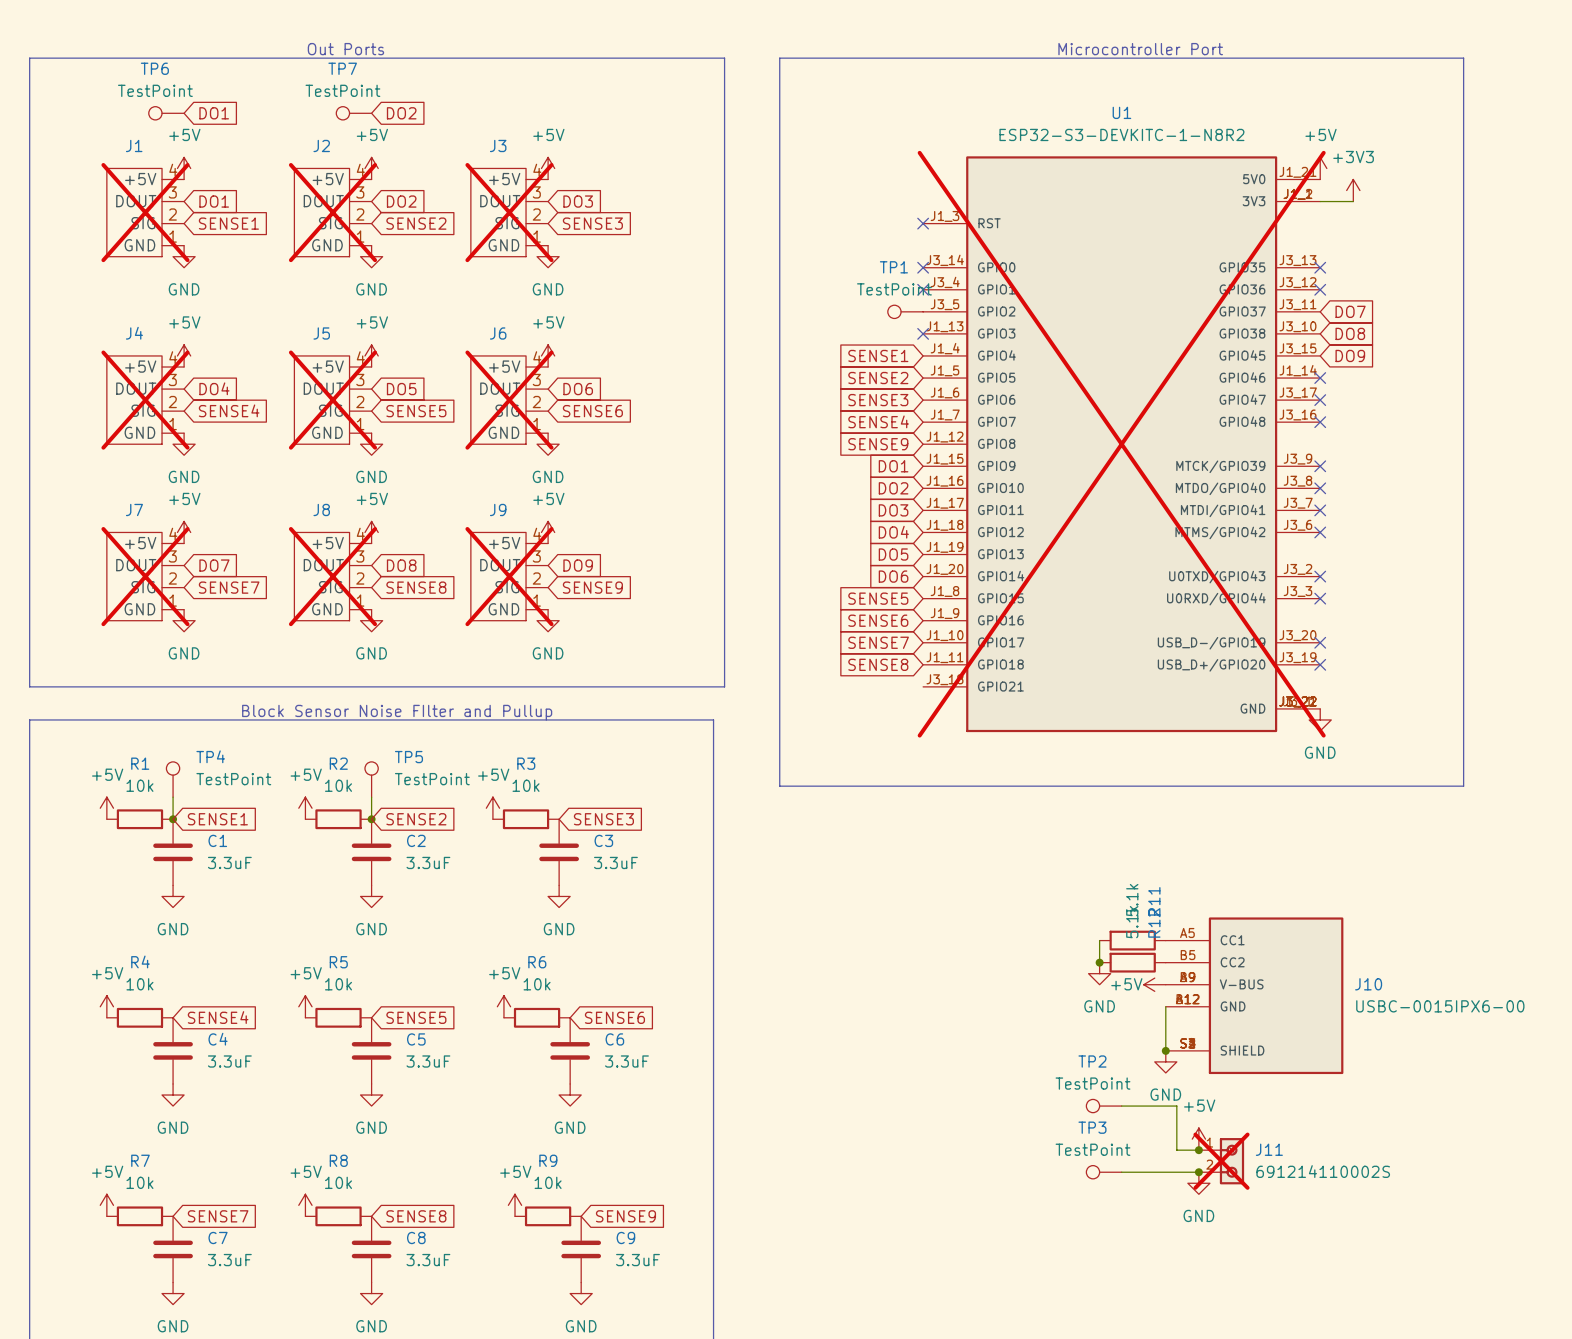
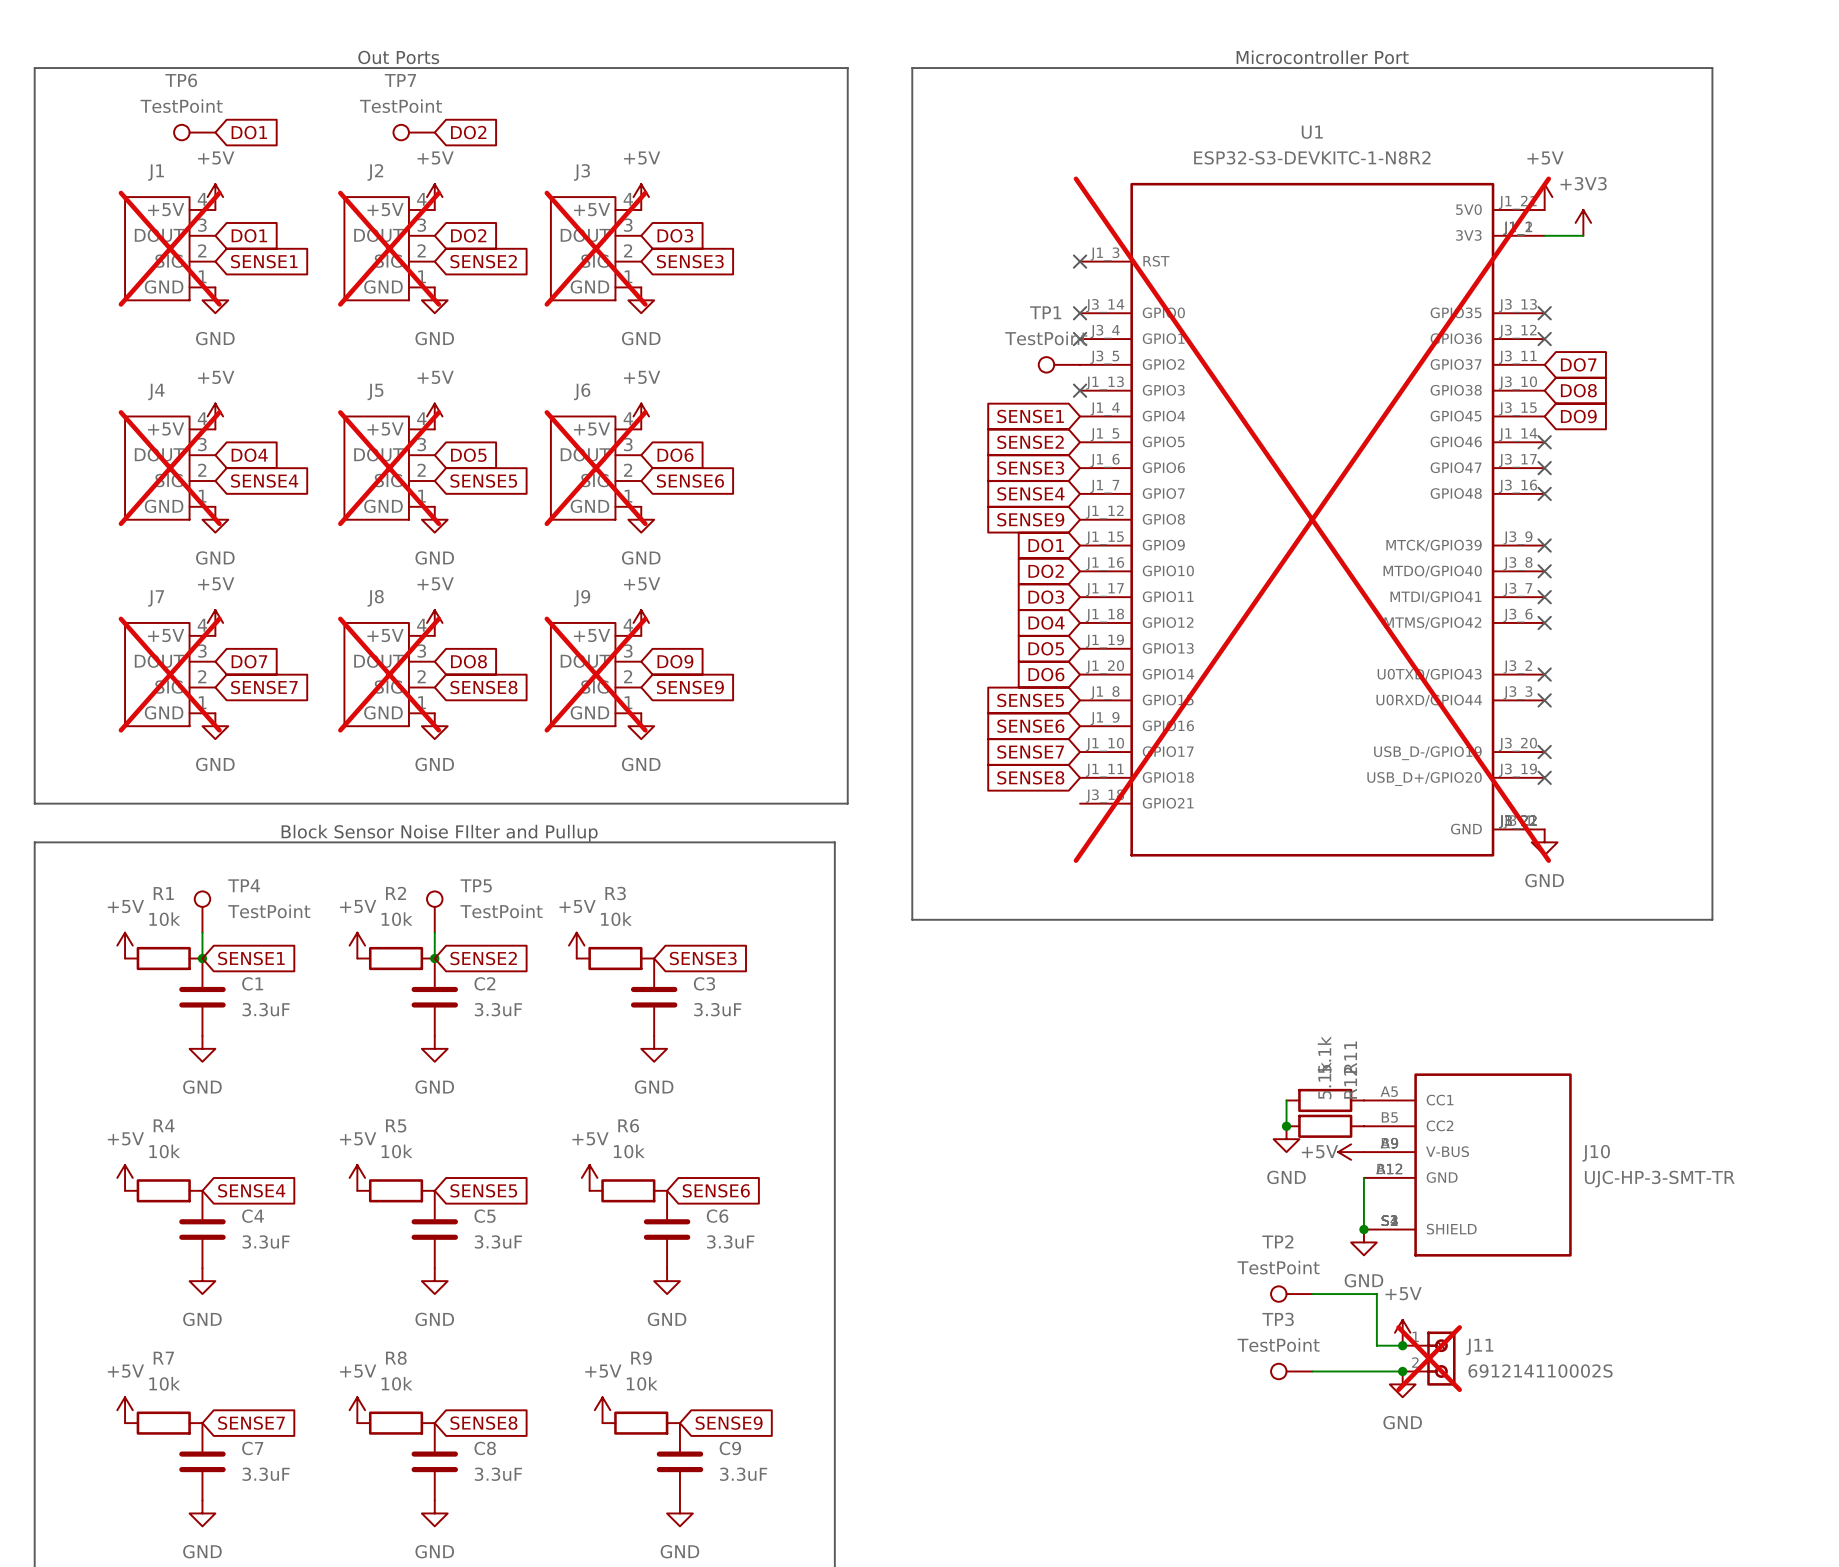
J10 value: USBC-0015IPX6-00 (1440, 1006) -> UJC-HP-3-SMT-TR (1659, 1179)

